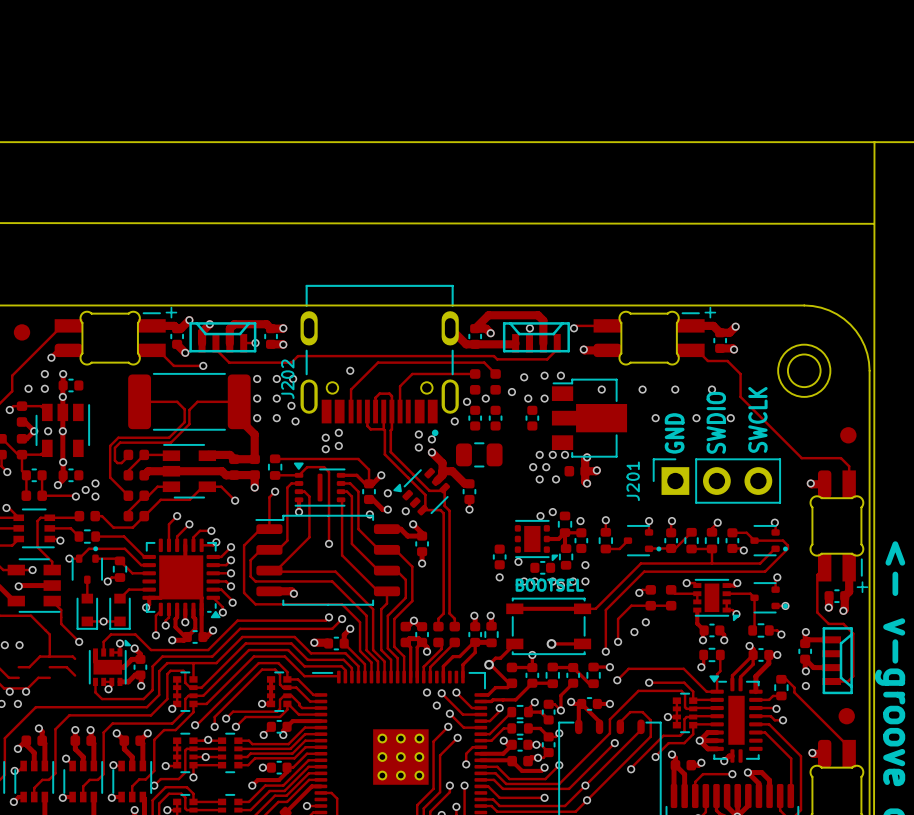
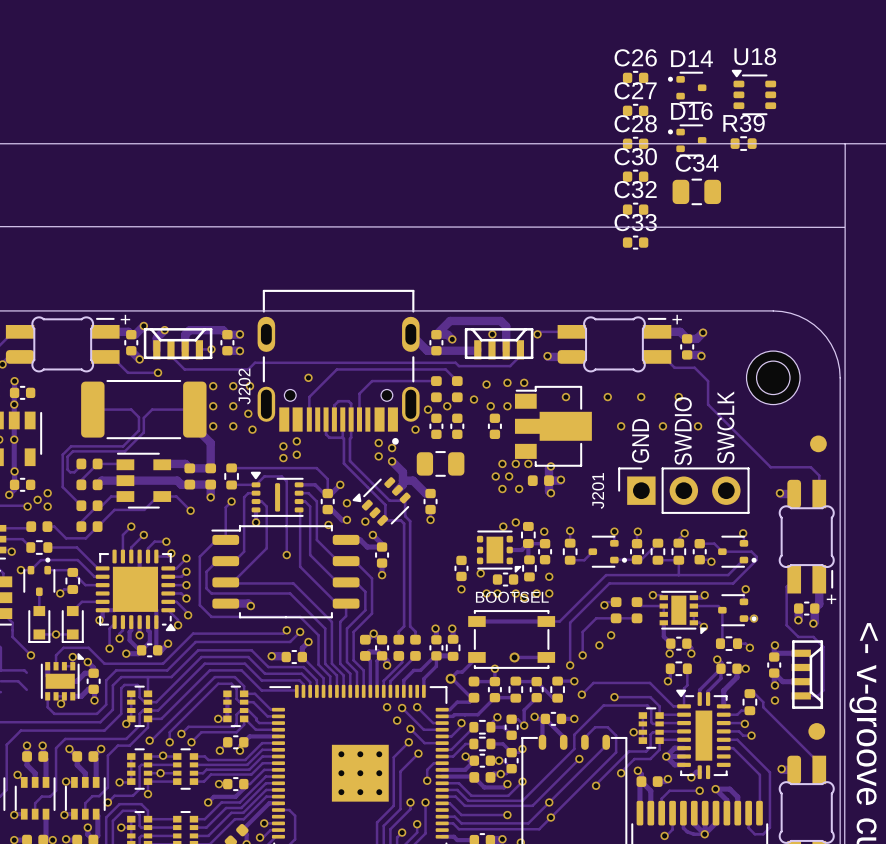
C26: none -> (635, 77)
D14: none -> (687, 87)
U18: none -> (753, 92)
C27: none -> (635, 110)
D16: none -> (687, 140)
C28: none -> (635, 143)
R39: none -> (743, 143)
C30: none -> (635, 176)
C34: none -> (696, 191)
C32: none -> (635, 209)
C33: none -> (635, 242)

